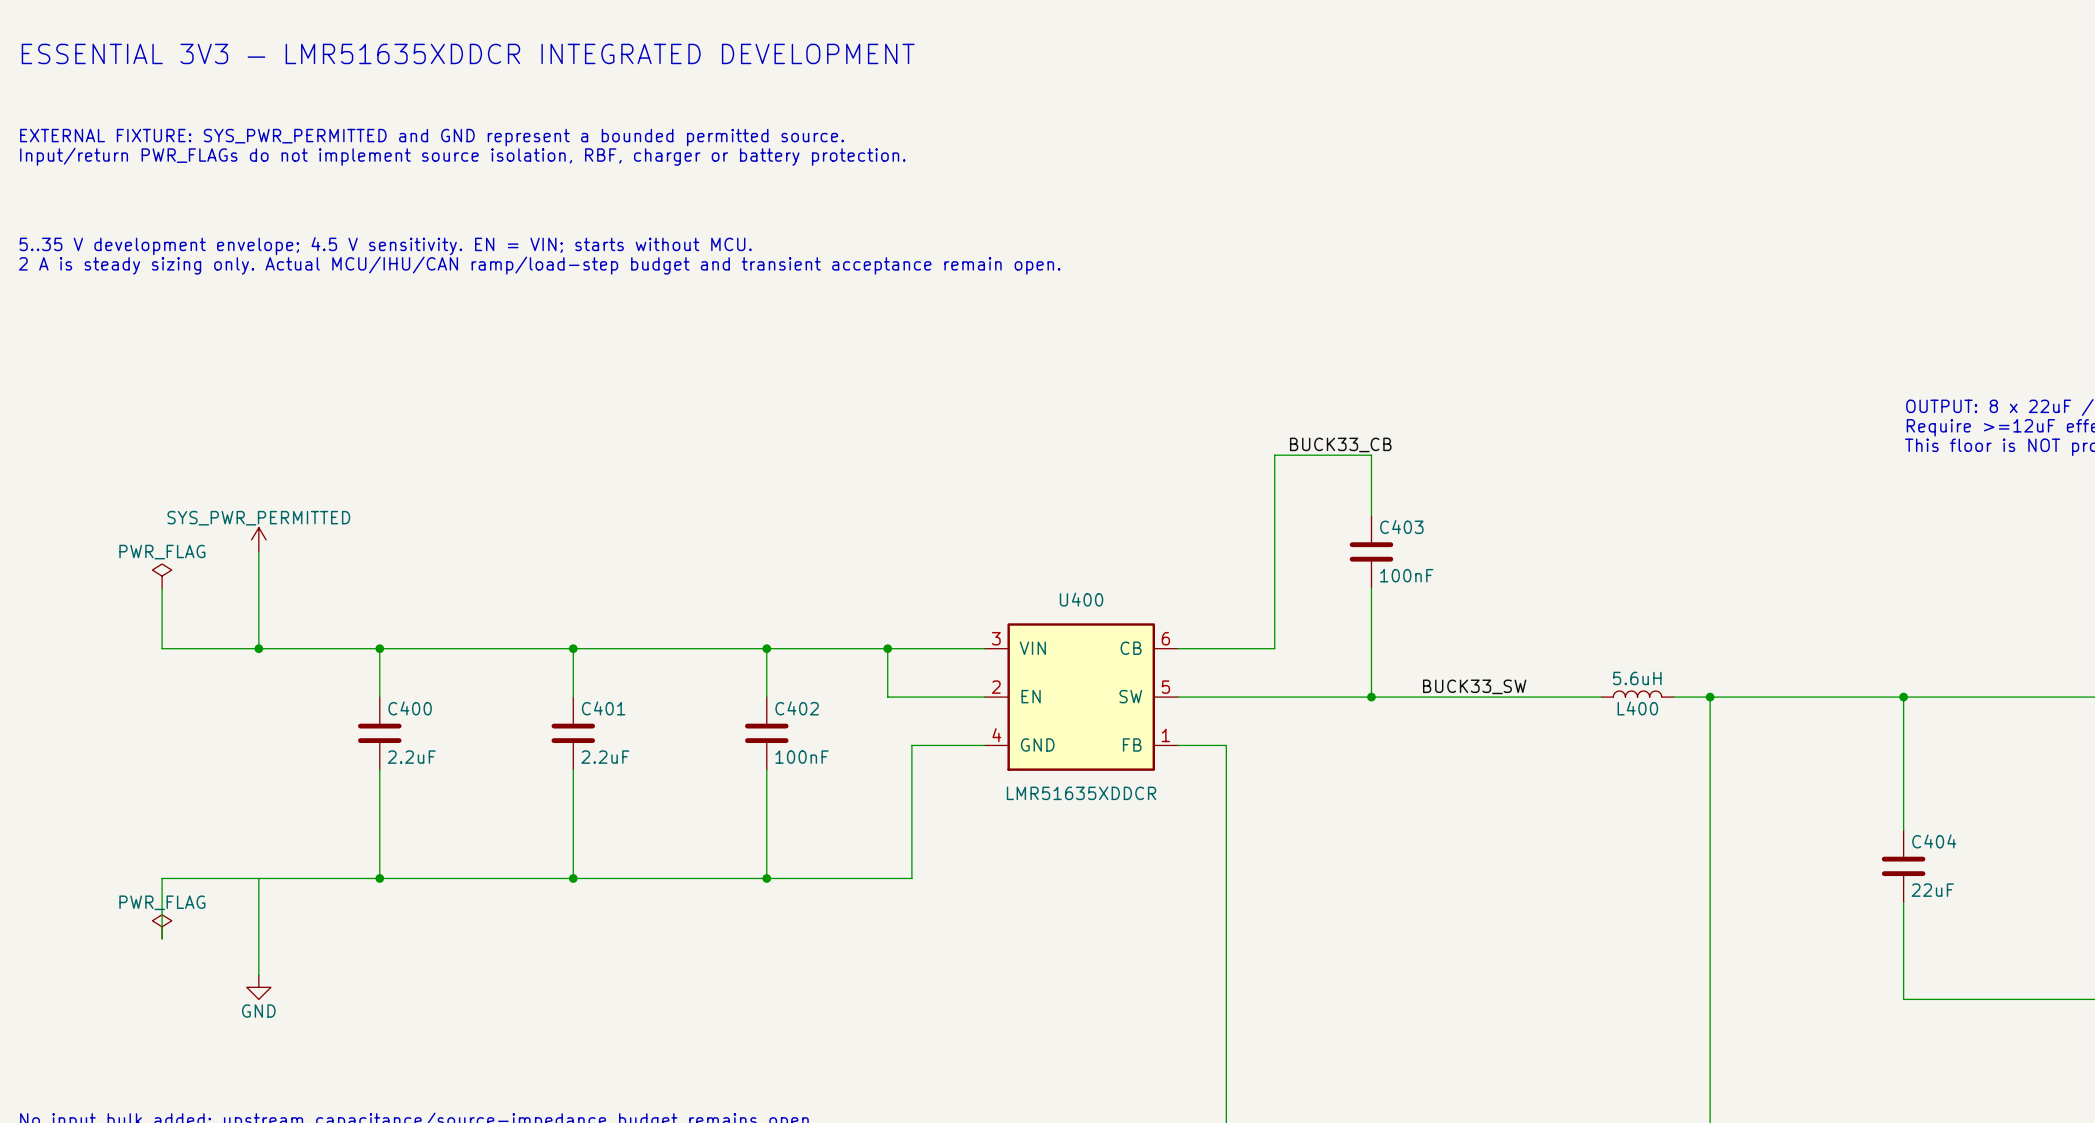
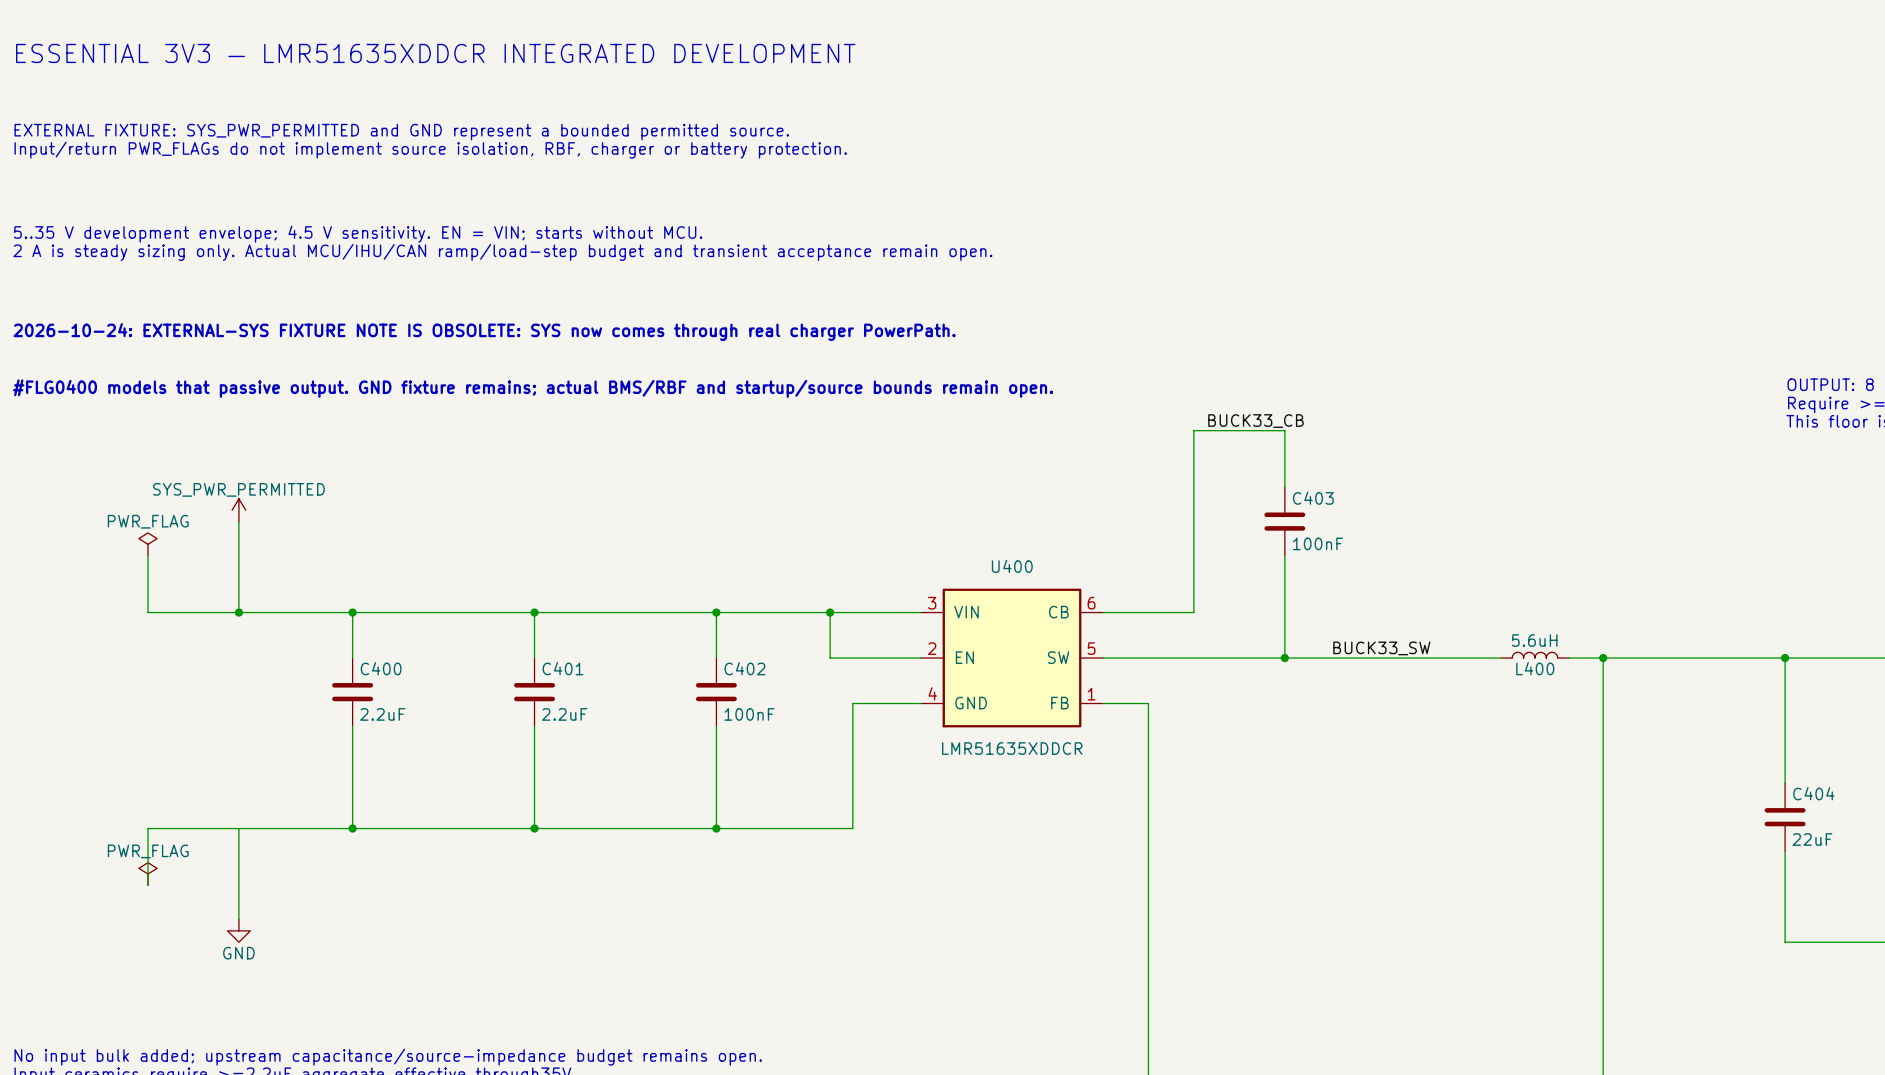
text: none -> 2026-10-24: EXTERNAL-SYS FIXTURE NOTE IS OBSOLETE: SYS now comes through real charger PowerPath. (484, 332)
text: none -> #FLG0400 models that passive output. GND fixture remains; actual BMS/RBF and startup/source bounds remain open. (533, 388)

